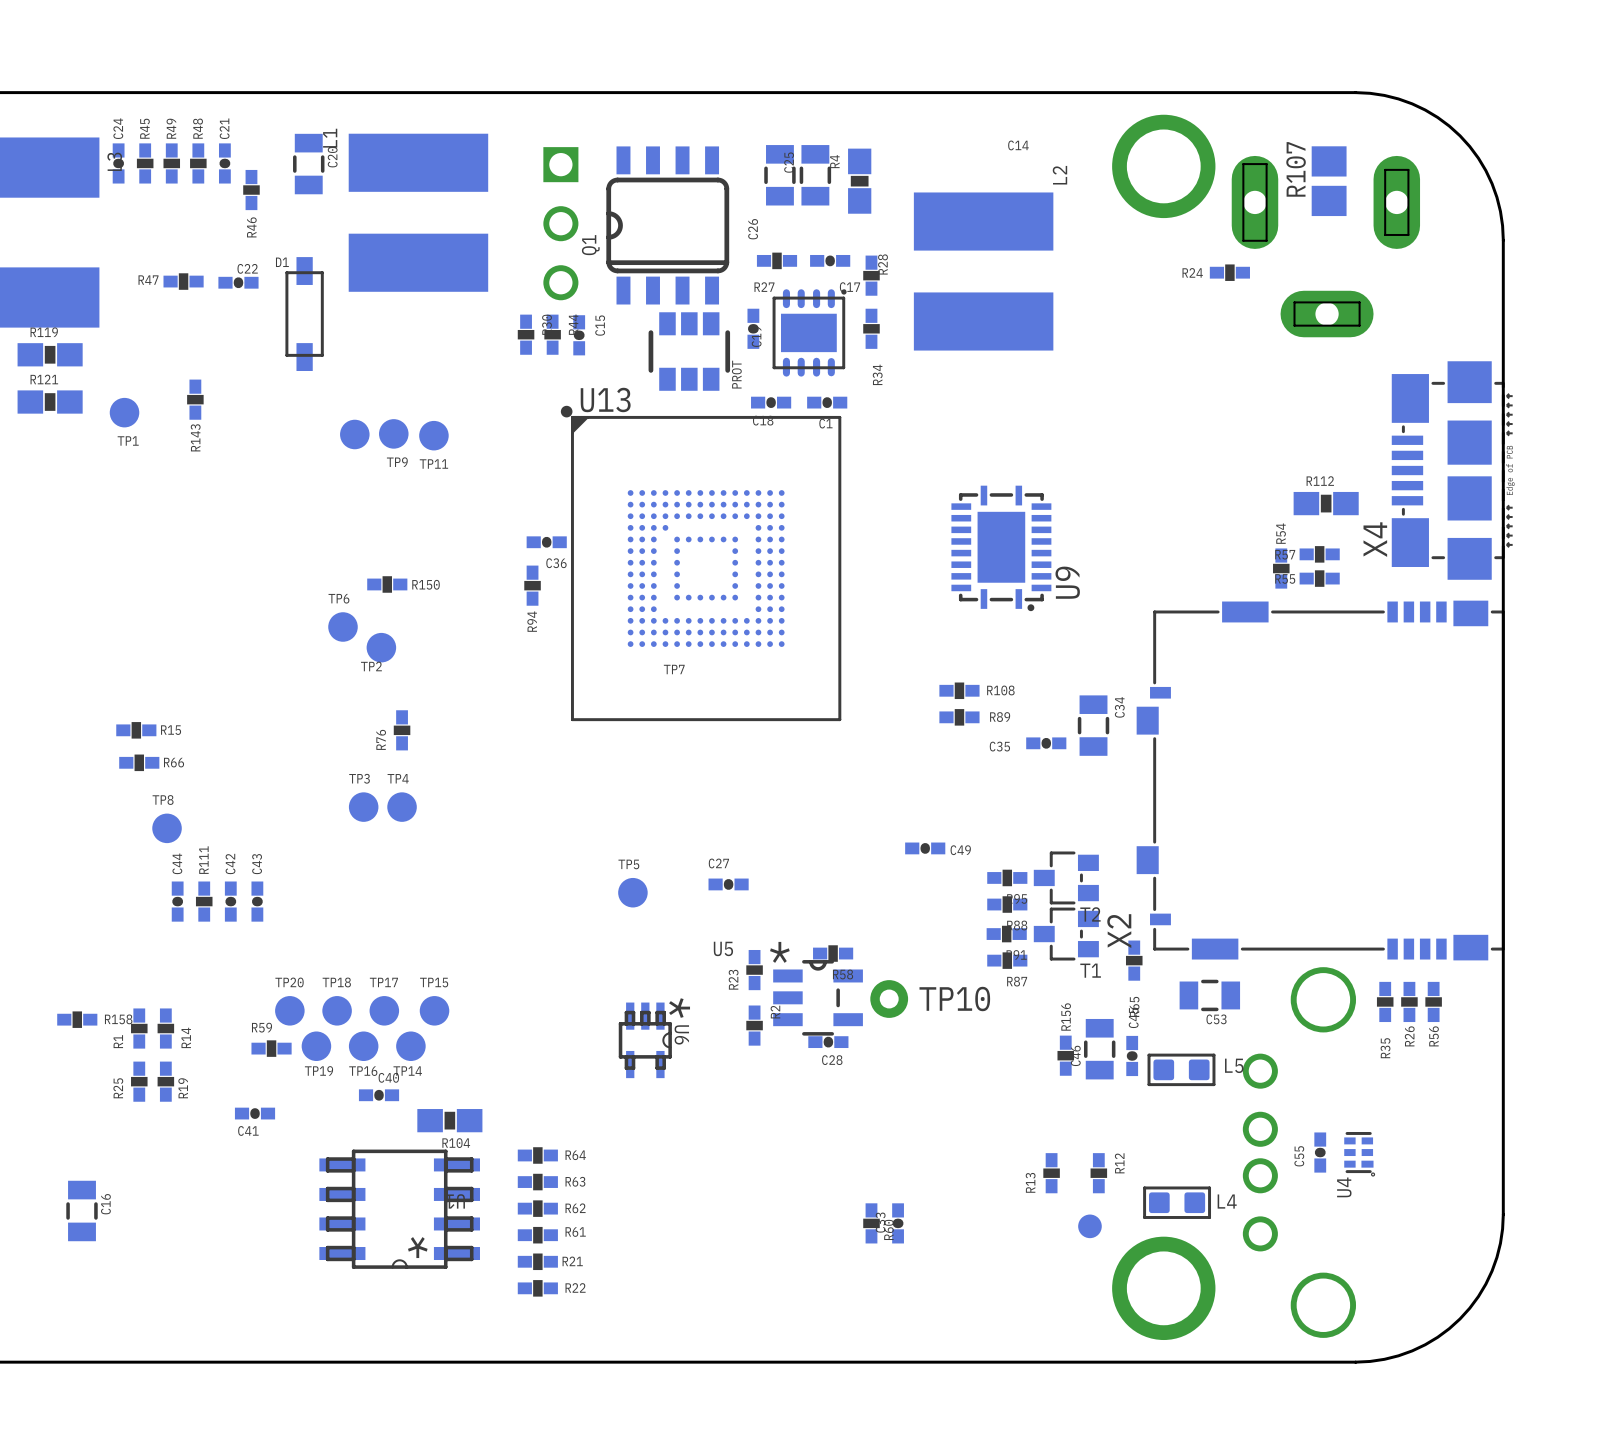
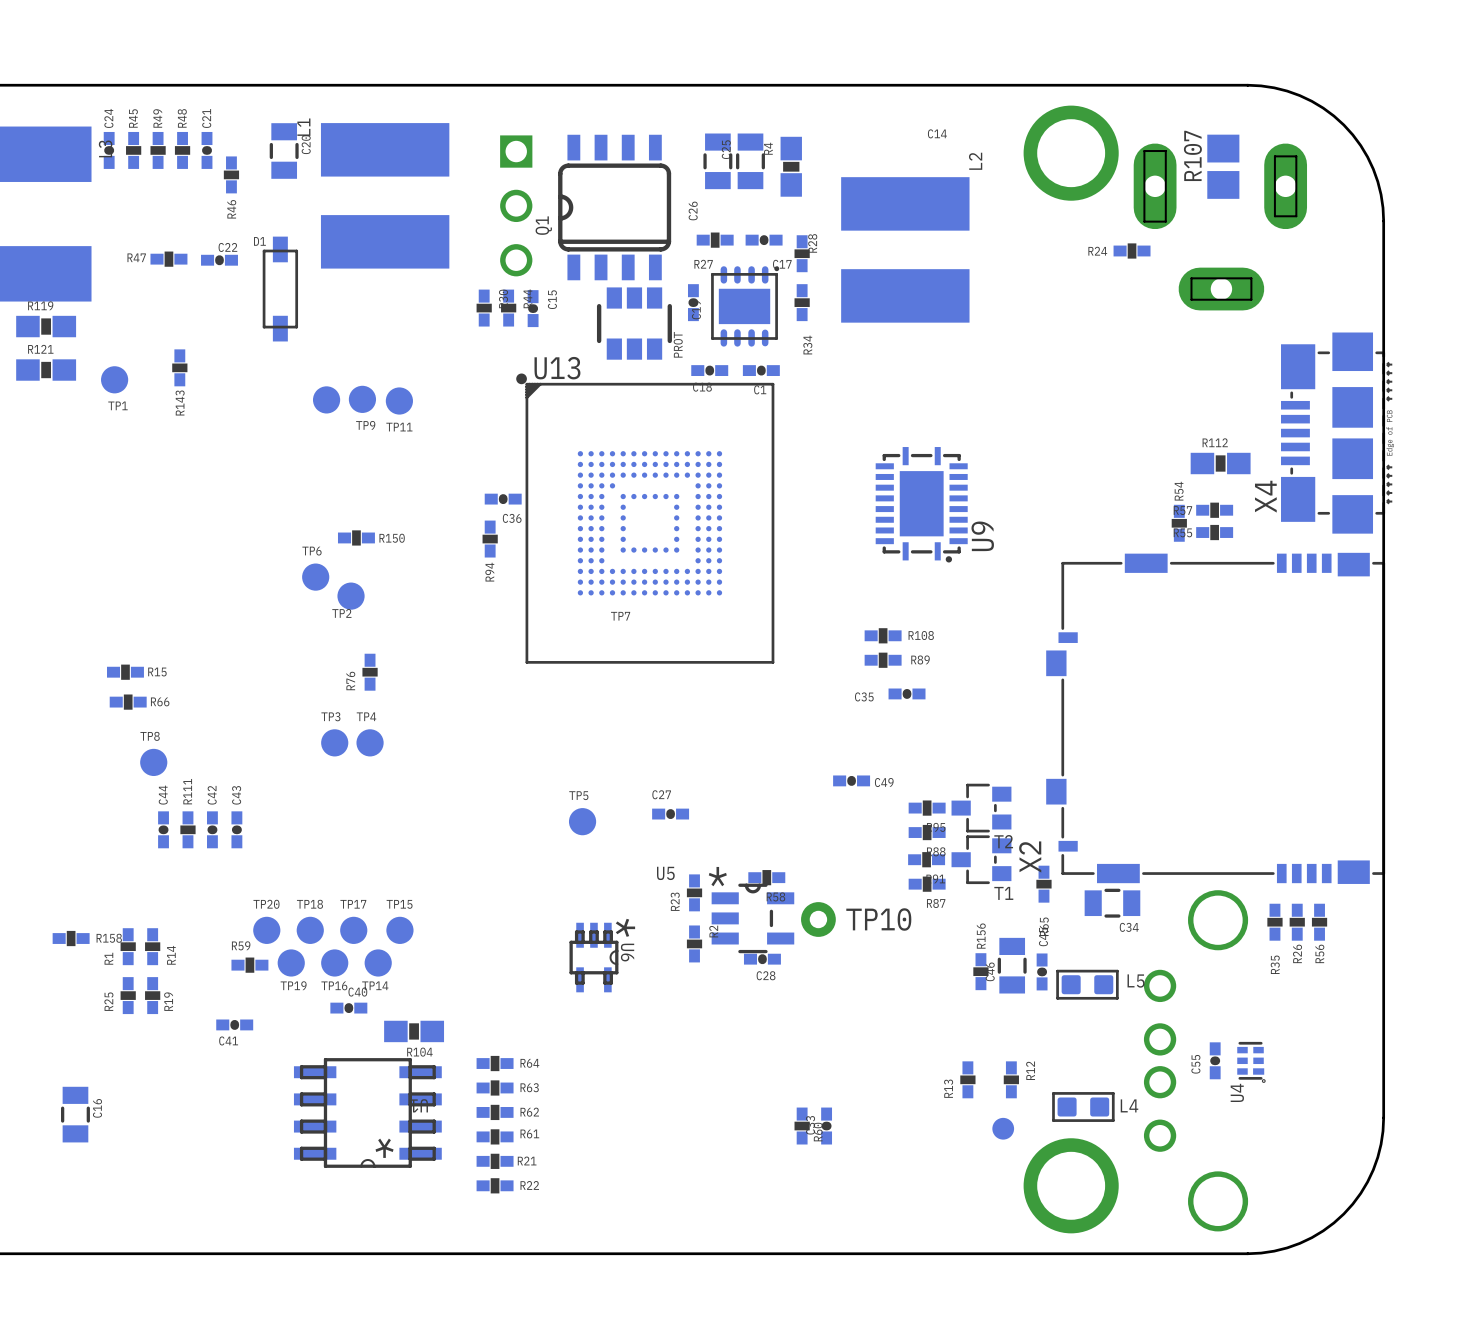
C34 rotation: 0° (1093, 725) -> 90° clockwise (1112, 903)
C34 position: (1093, 725) -> (1112, 903)
C35 position: (1046, 743) -> (907, 693)
C53: (1209, 995) -> none

